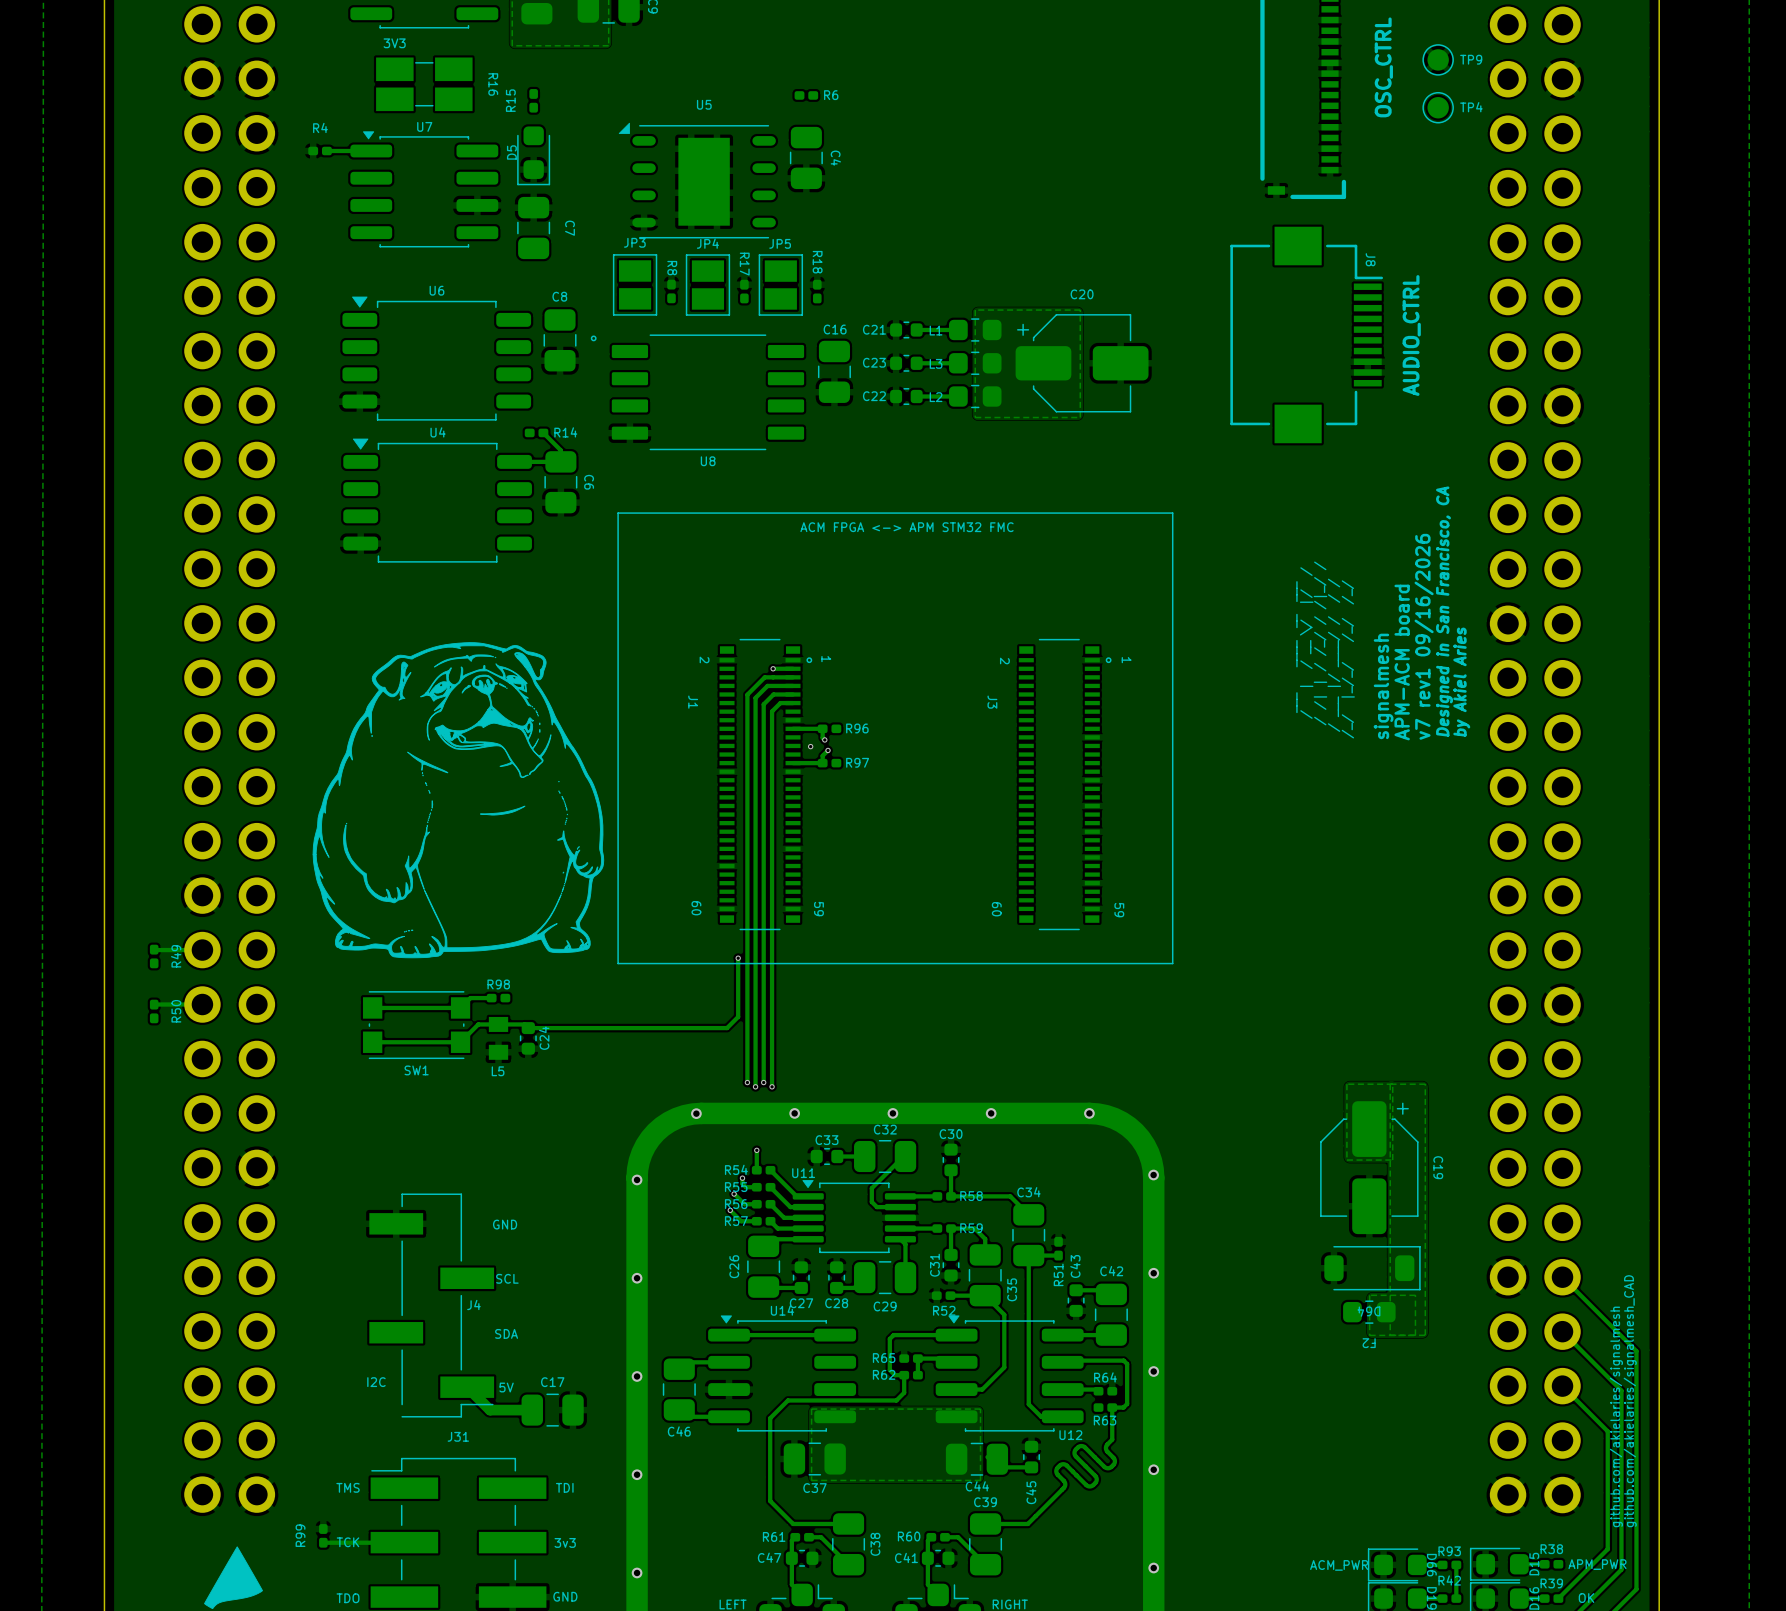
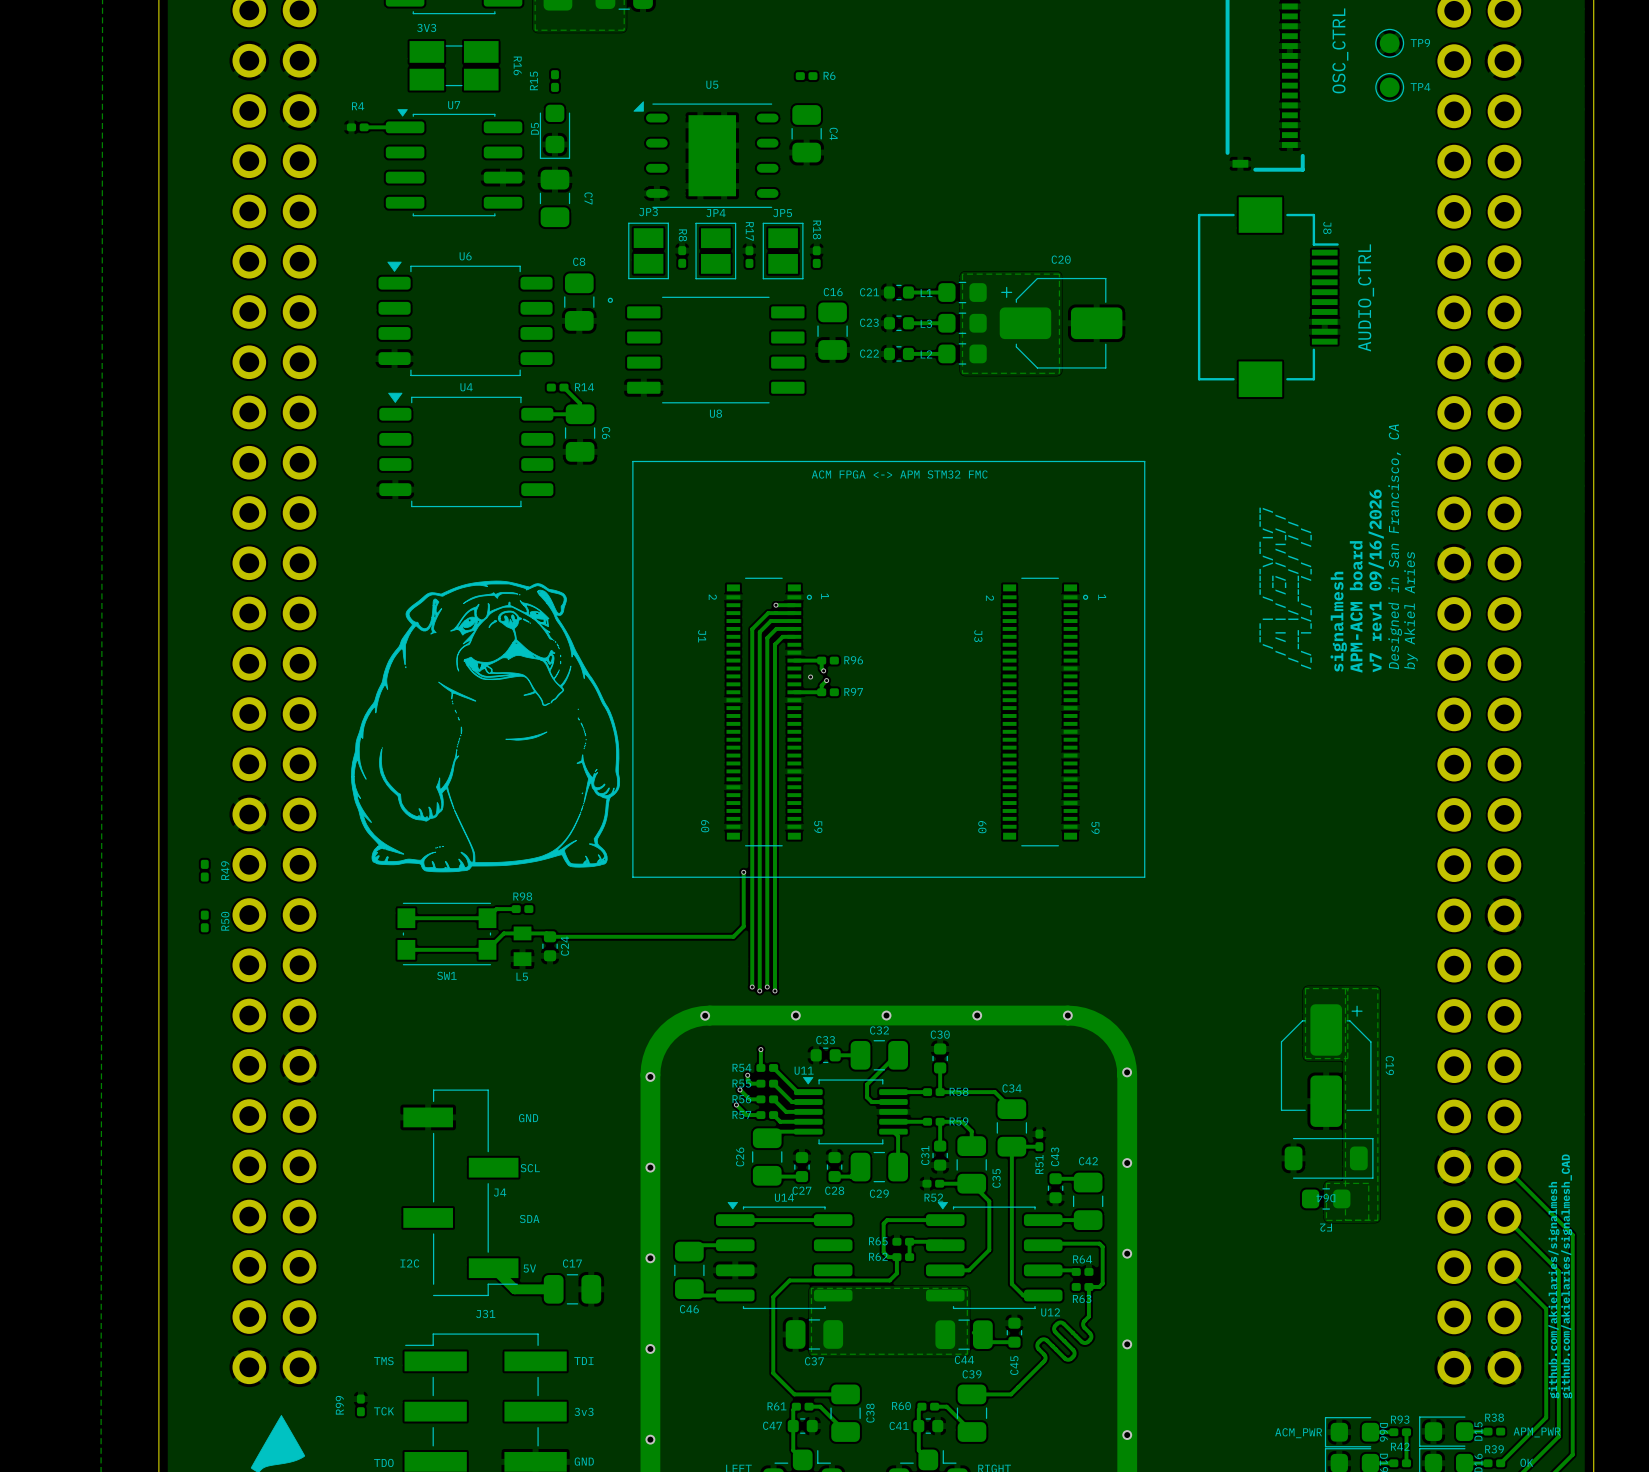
track: (154, 949) (202, 950) -> none
track: (202, 1004) (154, 1004) -> none
track: (404, 1542) (323, 1542) -> none

